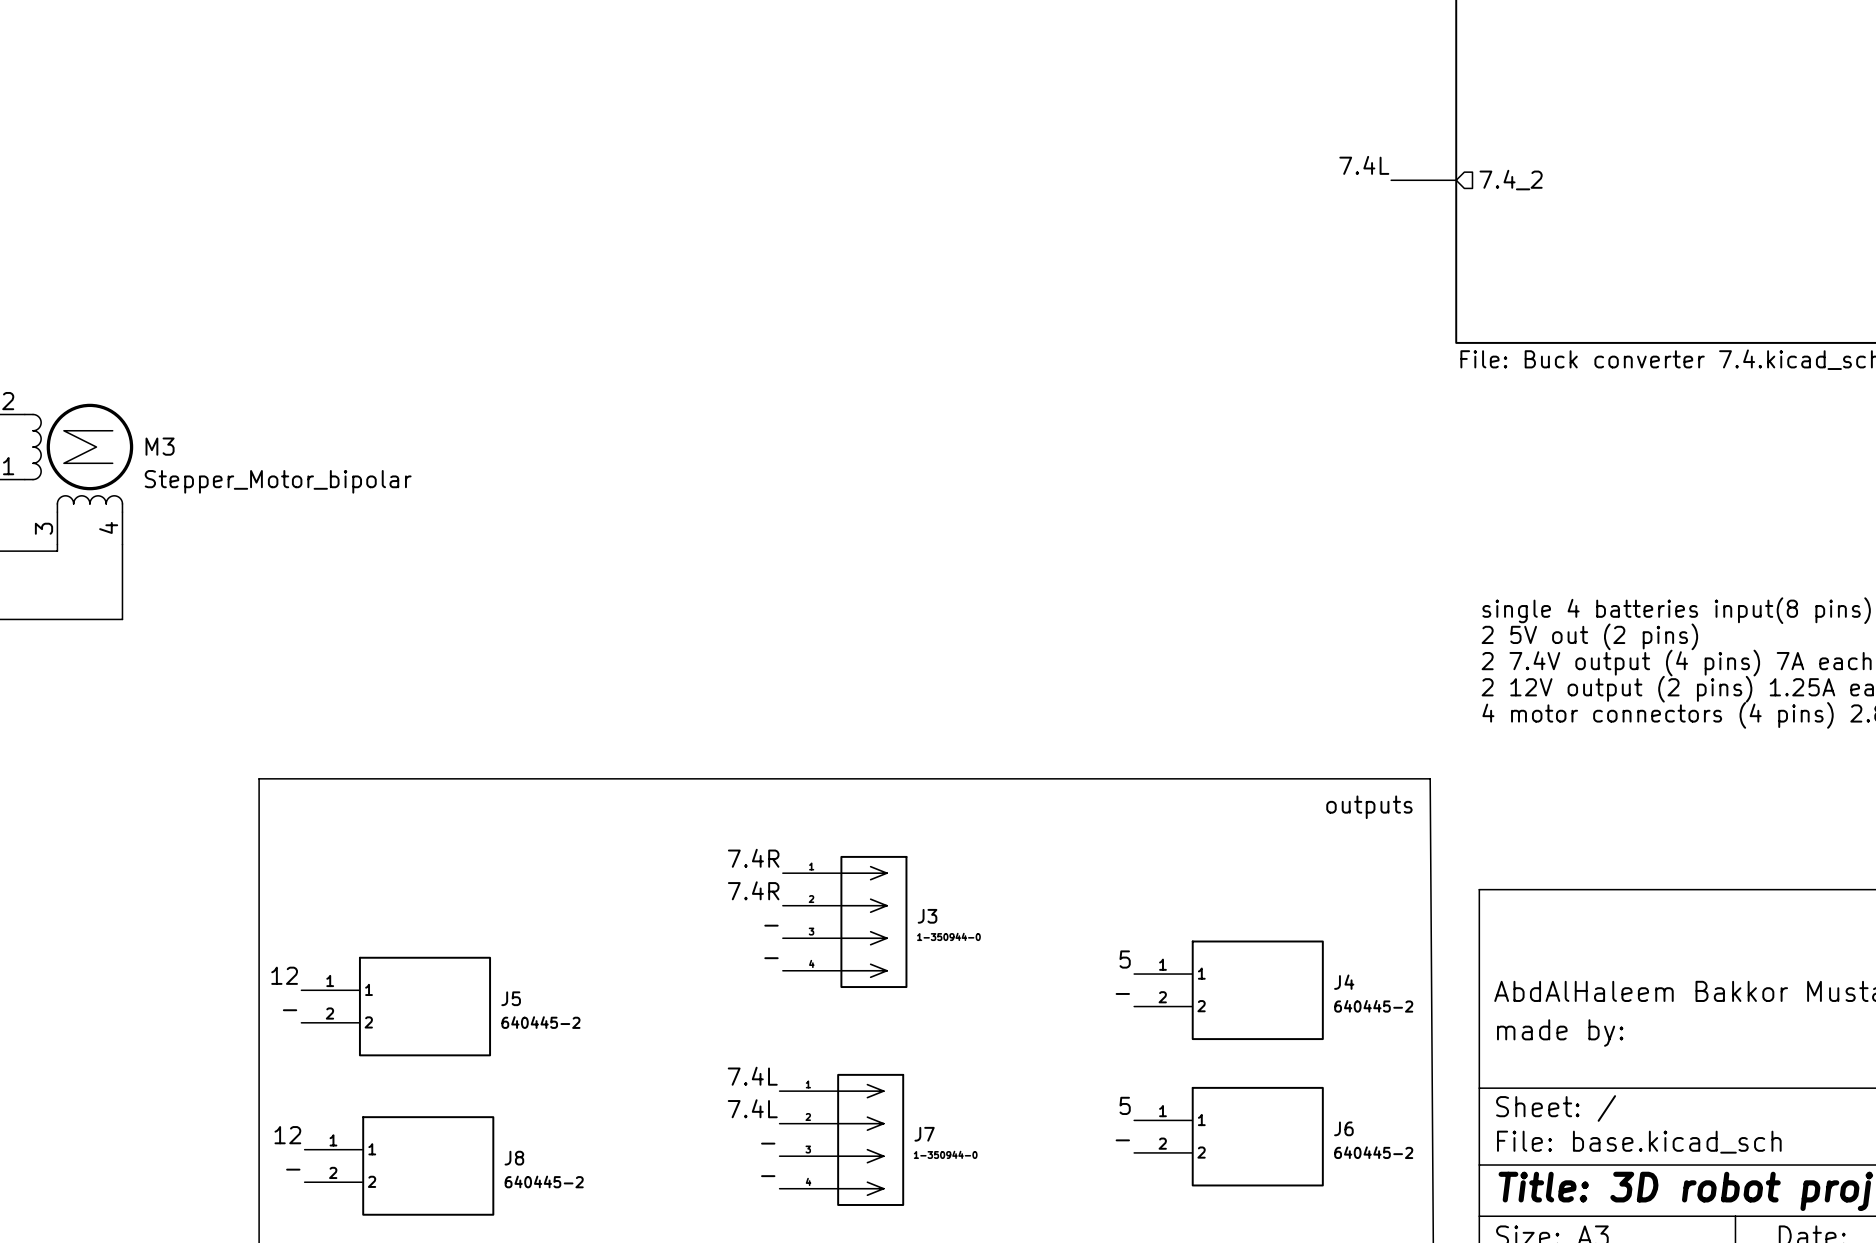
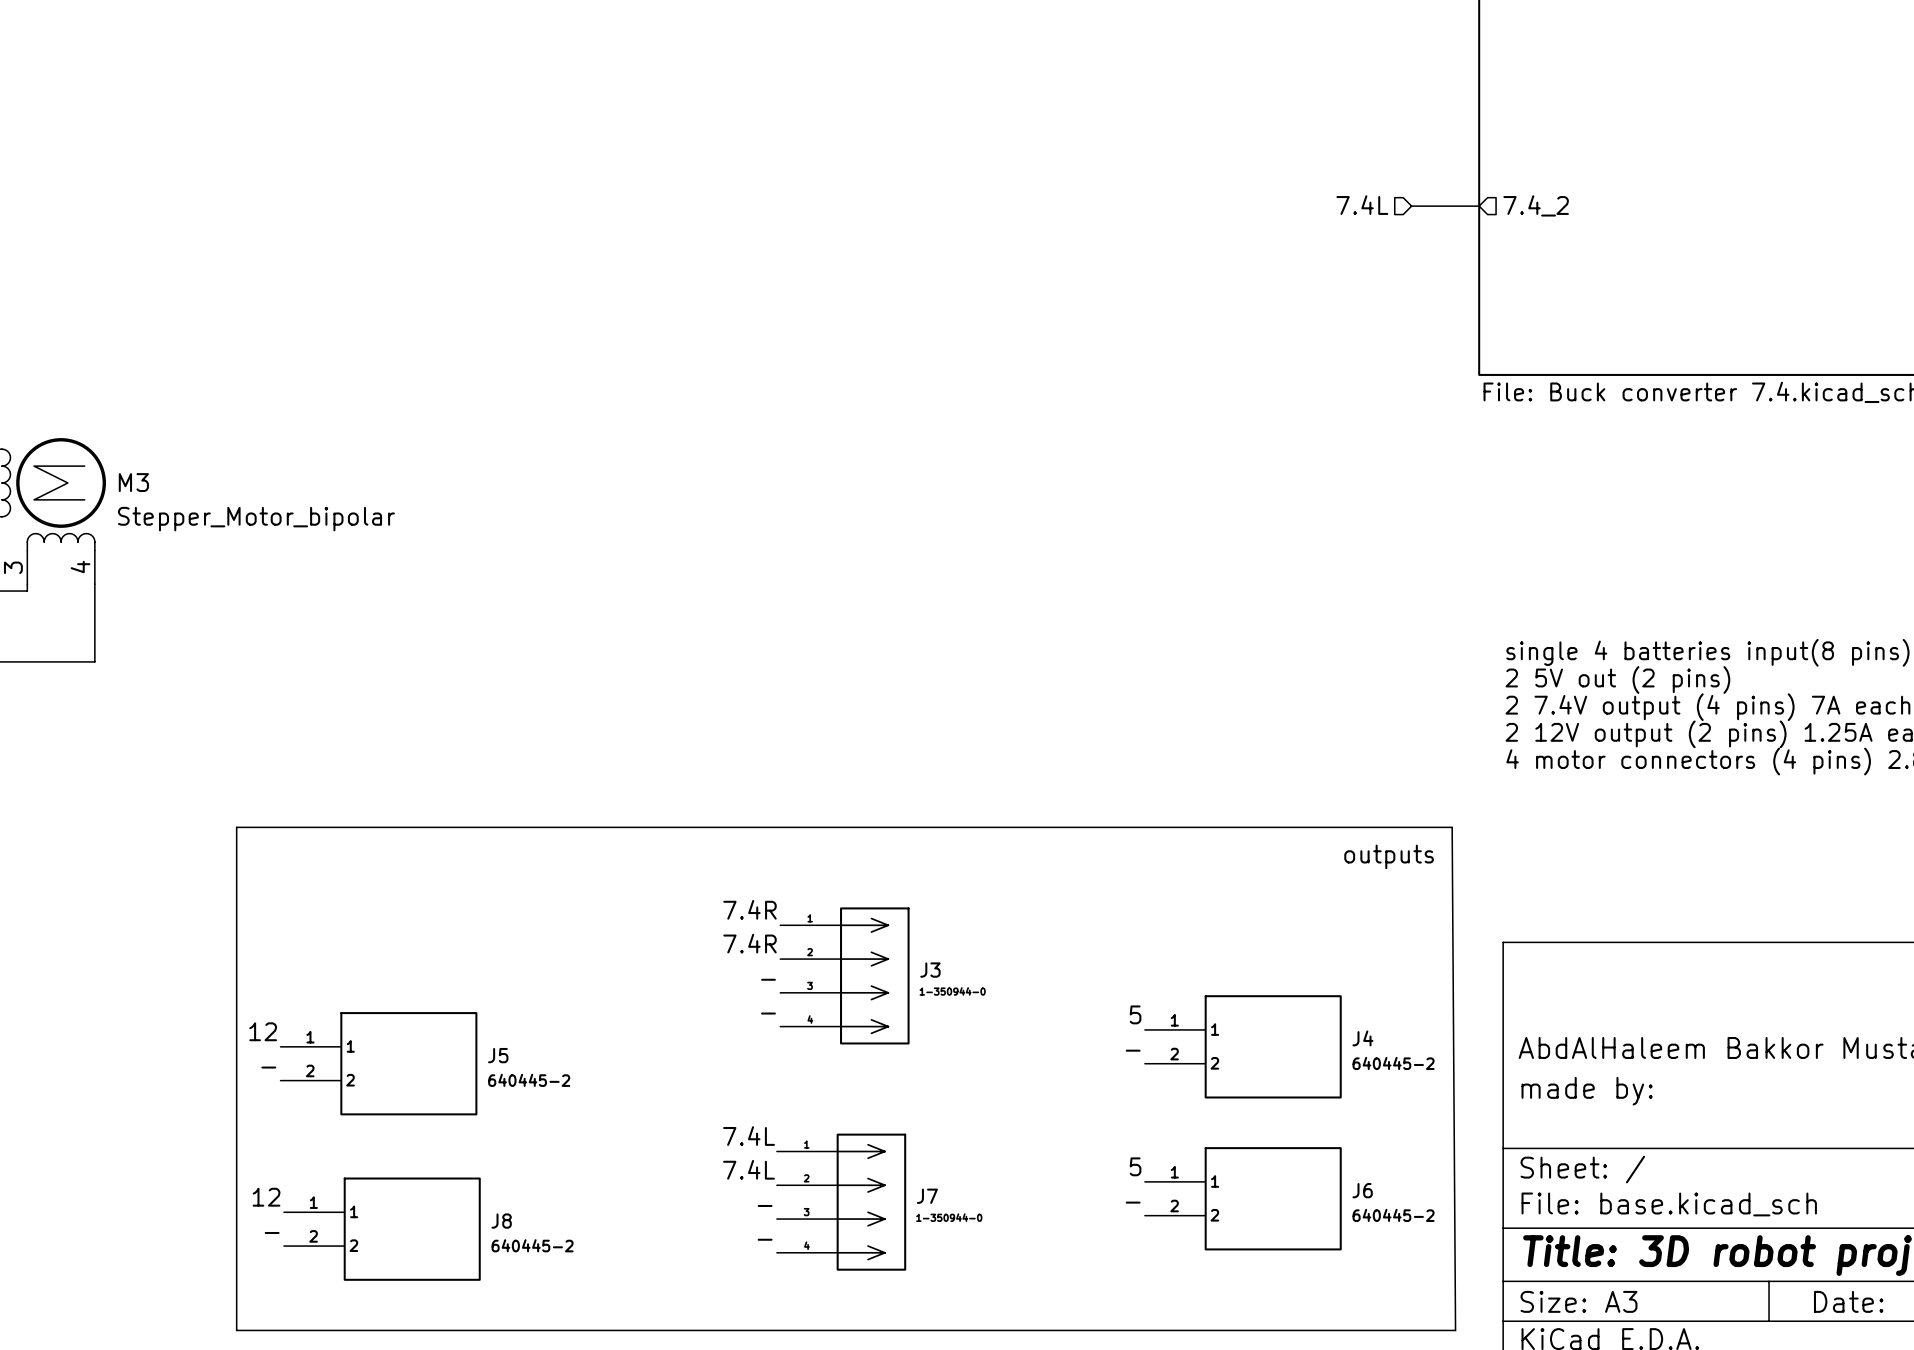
label: 7.4L (1364, 165) -> none
hierarchical label: none -> 7.4L (1362, 205)

